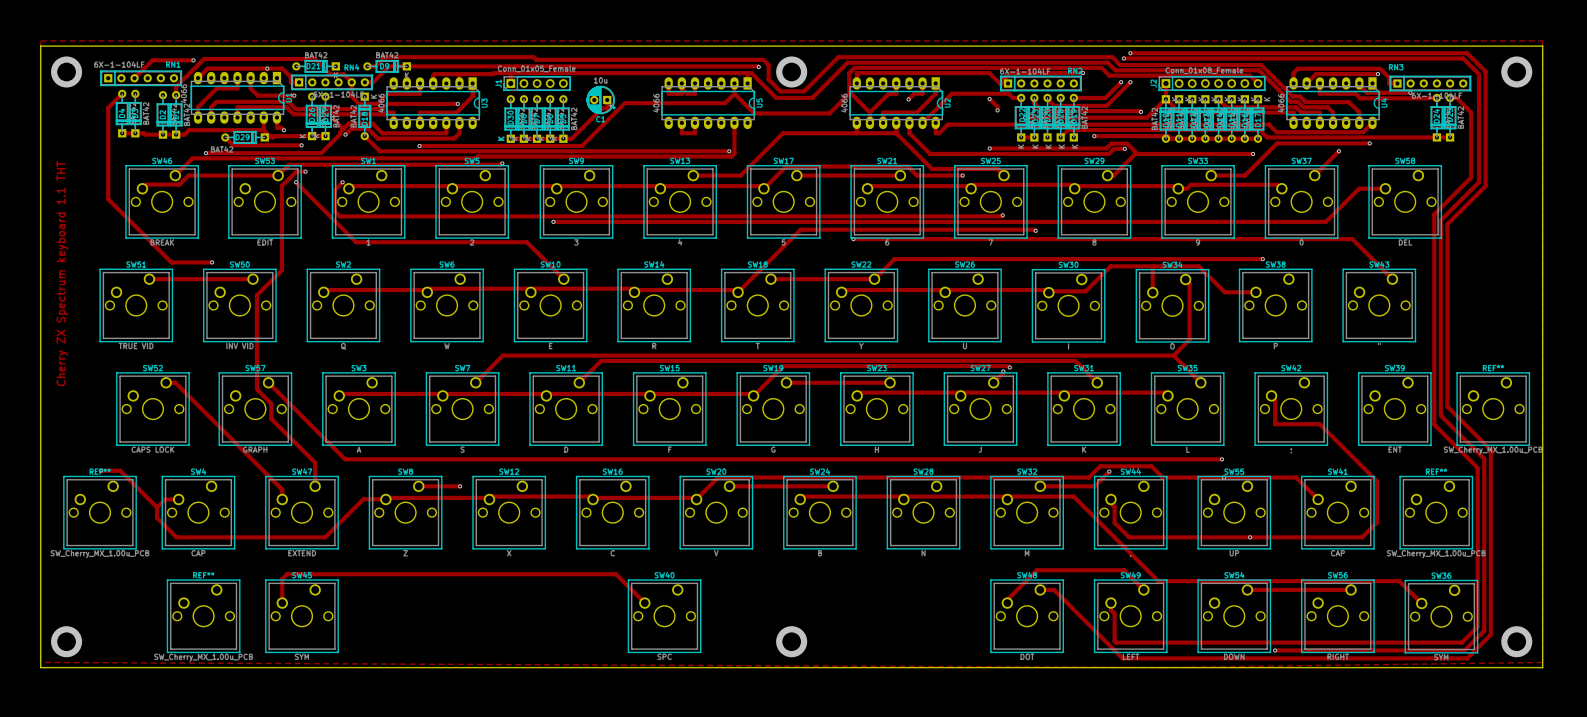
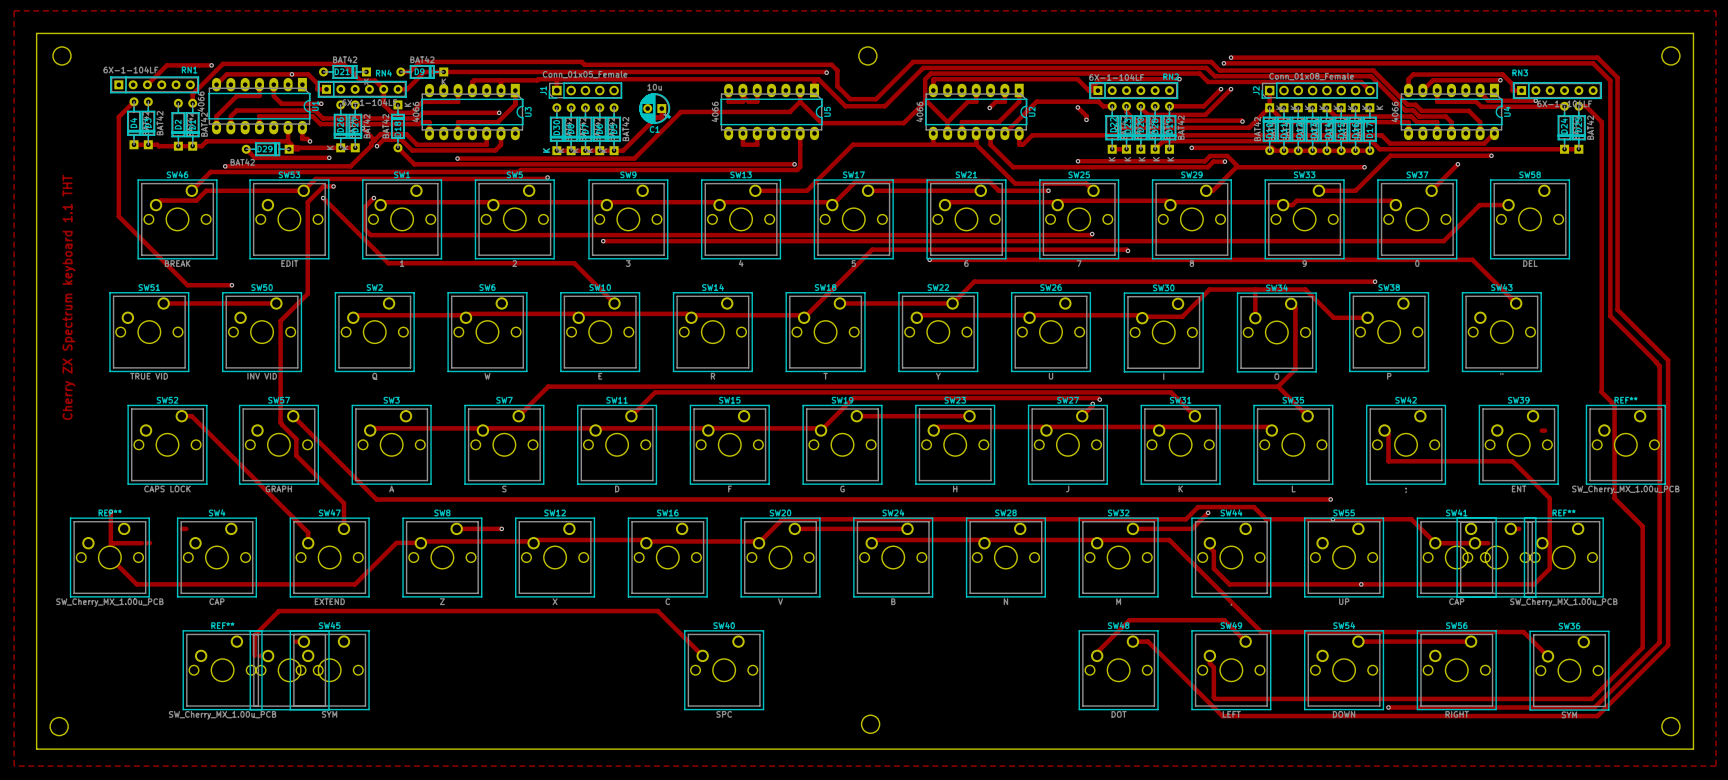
zone outline: (40, 40) (40, 662) (1164, 667) (1542, 662) (1542, 40) (40, 40) -> (14, 10) (14, 766) (1715, 766) (1715, 10) (14, 10)
round board edge: none -> [52, 46, 72, 66]
round board edge: none -> [858, 46, 878, 66]
round board edge: none -> [1661, 46, 1681, 66]
board edge: (40, 46) (1542, 46) (1542, 667) (40, 667) (40, 46) -> (36, 33) (36, 749) (1693, 749) (1693, 33) (36, 33)
via: (66, 71) -> none
via: (791, 71) -> none
via: (1516, 71) -> none
track: (1471, 177) (1434, 214) (1434, 424) (1477, 468) (1477, 626) -> (1601, 192) (1601, 391) (1614, 405) (1614, 498) (1642, 526) (1642, 647) (1608, 681)
track: (1479, 182) (1440, 220) (1440, 415) (1484, 459) (1484, 630) -> (1610, 316) (1659, 365) (1659, 642) (1616, 686)
track: none -> (1610, 197) (1610, 316)
track: (1485, 186) (1447, 224) (1447, 406) (1490, 450) (1490, 634) -> (1617, 202) (1617, 309) (1668, 360) (1668, 645) (1623, 690)
track: none -> (1541, 430) (1545, 430)
track: (1319, 424) (1376, 481) (1376, 522) (1362, 537) -> (1437, 461) (1512, 461) (1549, 498) (1549, 568) (1534, 584) (1483, 584)
track: (100, 470) (120, 470) (156, 507) -> (110, 511) (110, 558) (136, 584) (193, 584)
track: none -> (181, 528) (186, 528)
track: none -> (1515, 528) (1519, 528)
track: none -> (141, 543) (113, 543) (110, 546)
track: none -> (147, 543) (150, 543)
track: (178, 499) (164, 499) (156, 507) -> none
track: none -> (1435, 543) (1488, 543)
track: (156, 507) (156, 517) (176, 537) -> none
part: none -> (1496, 557)
track: (615, 574) (287, 574) (282, 578) (282, 603) -> (671, 624) (657, 611) (278, 611) (254, 635) (254, 655)
track: none -> (298, 641) (295, 641)
track: none -> (259, 655) (263, 655)
part: none -> (289, 670)
via: (66, 641) -> none
via: (791, 641) -> none
via: (1516, 641) -> none
round board edge: none -> [861, 715, 880, 734]
round board edge: none -> [50, 717, 69, 736]
round board edge: none -> [1661, 717, 1681, 736]

